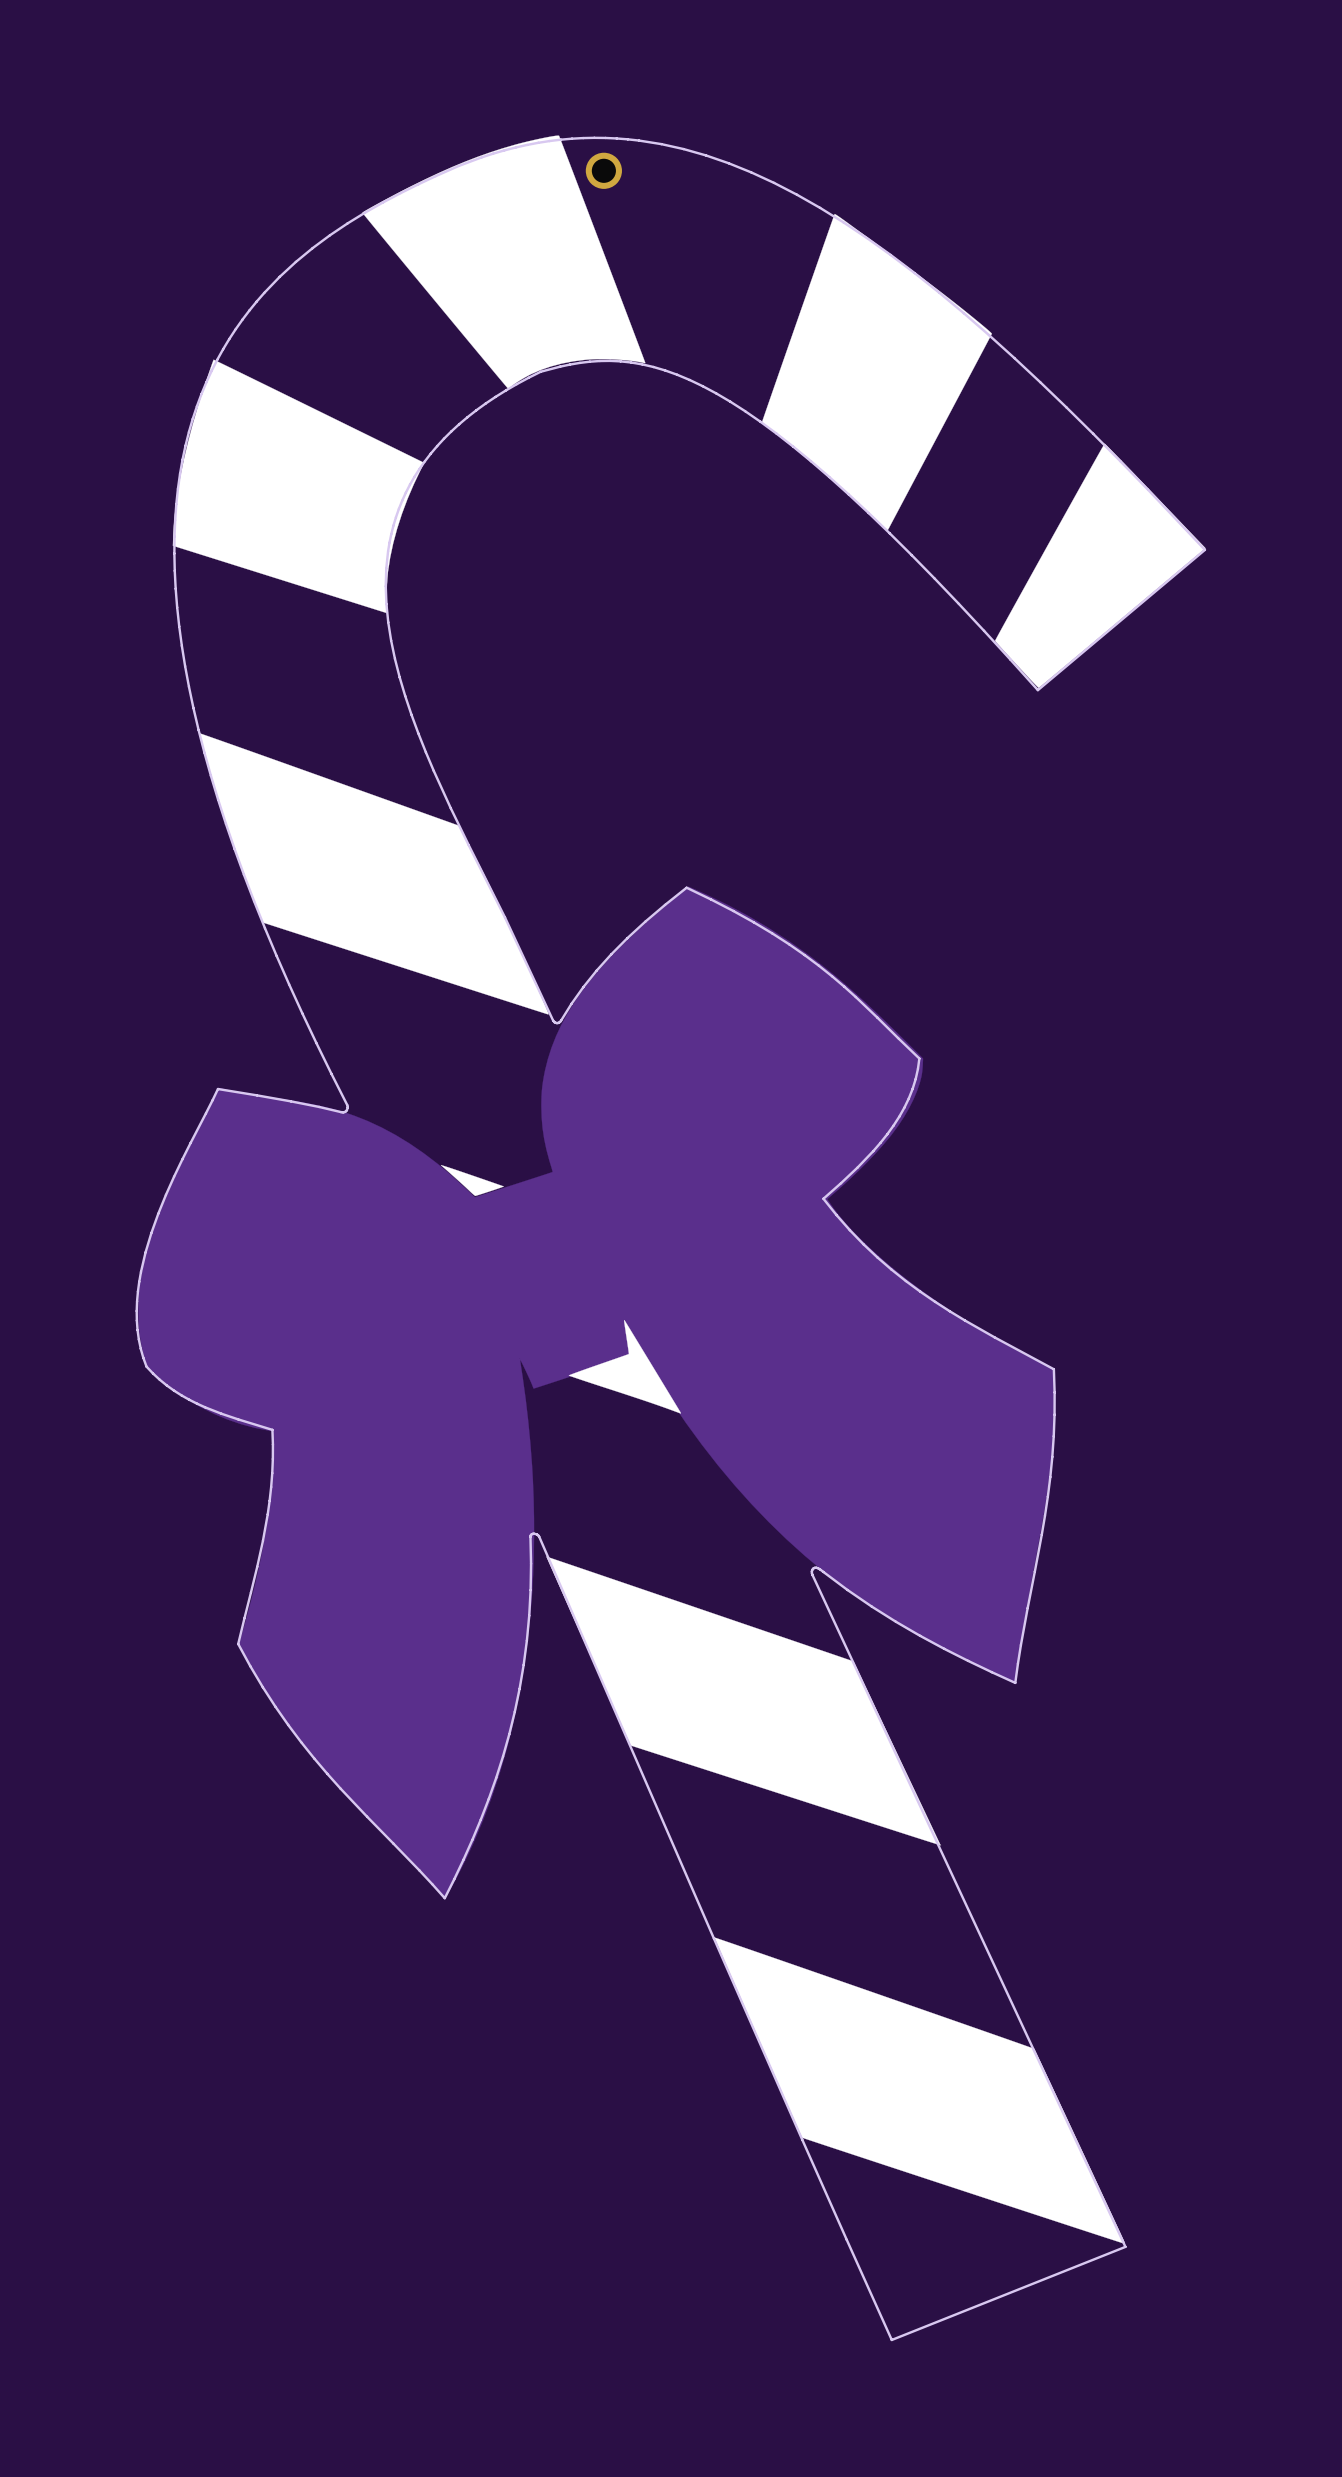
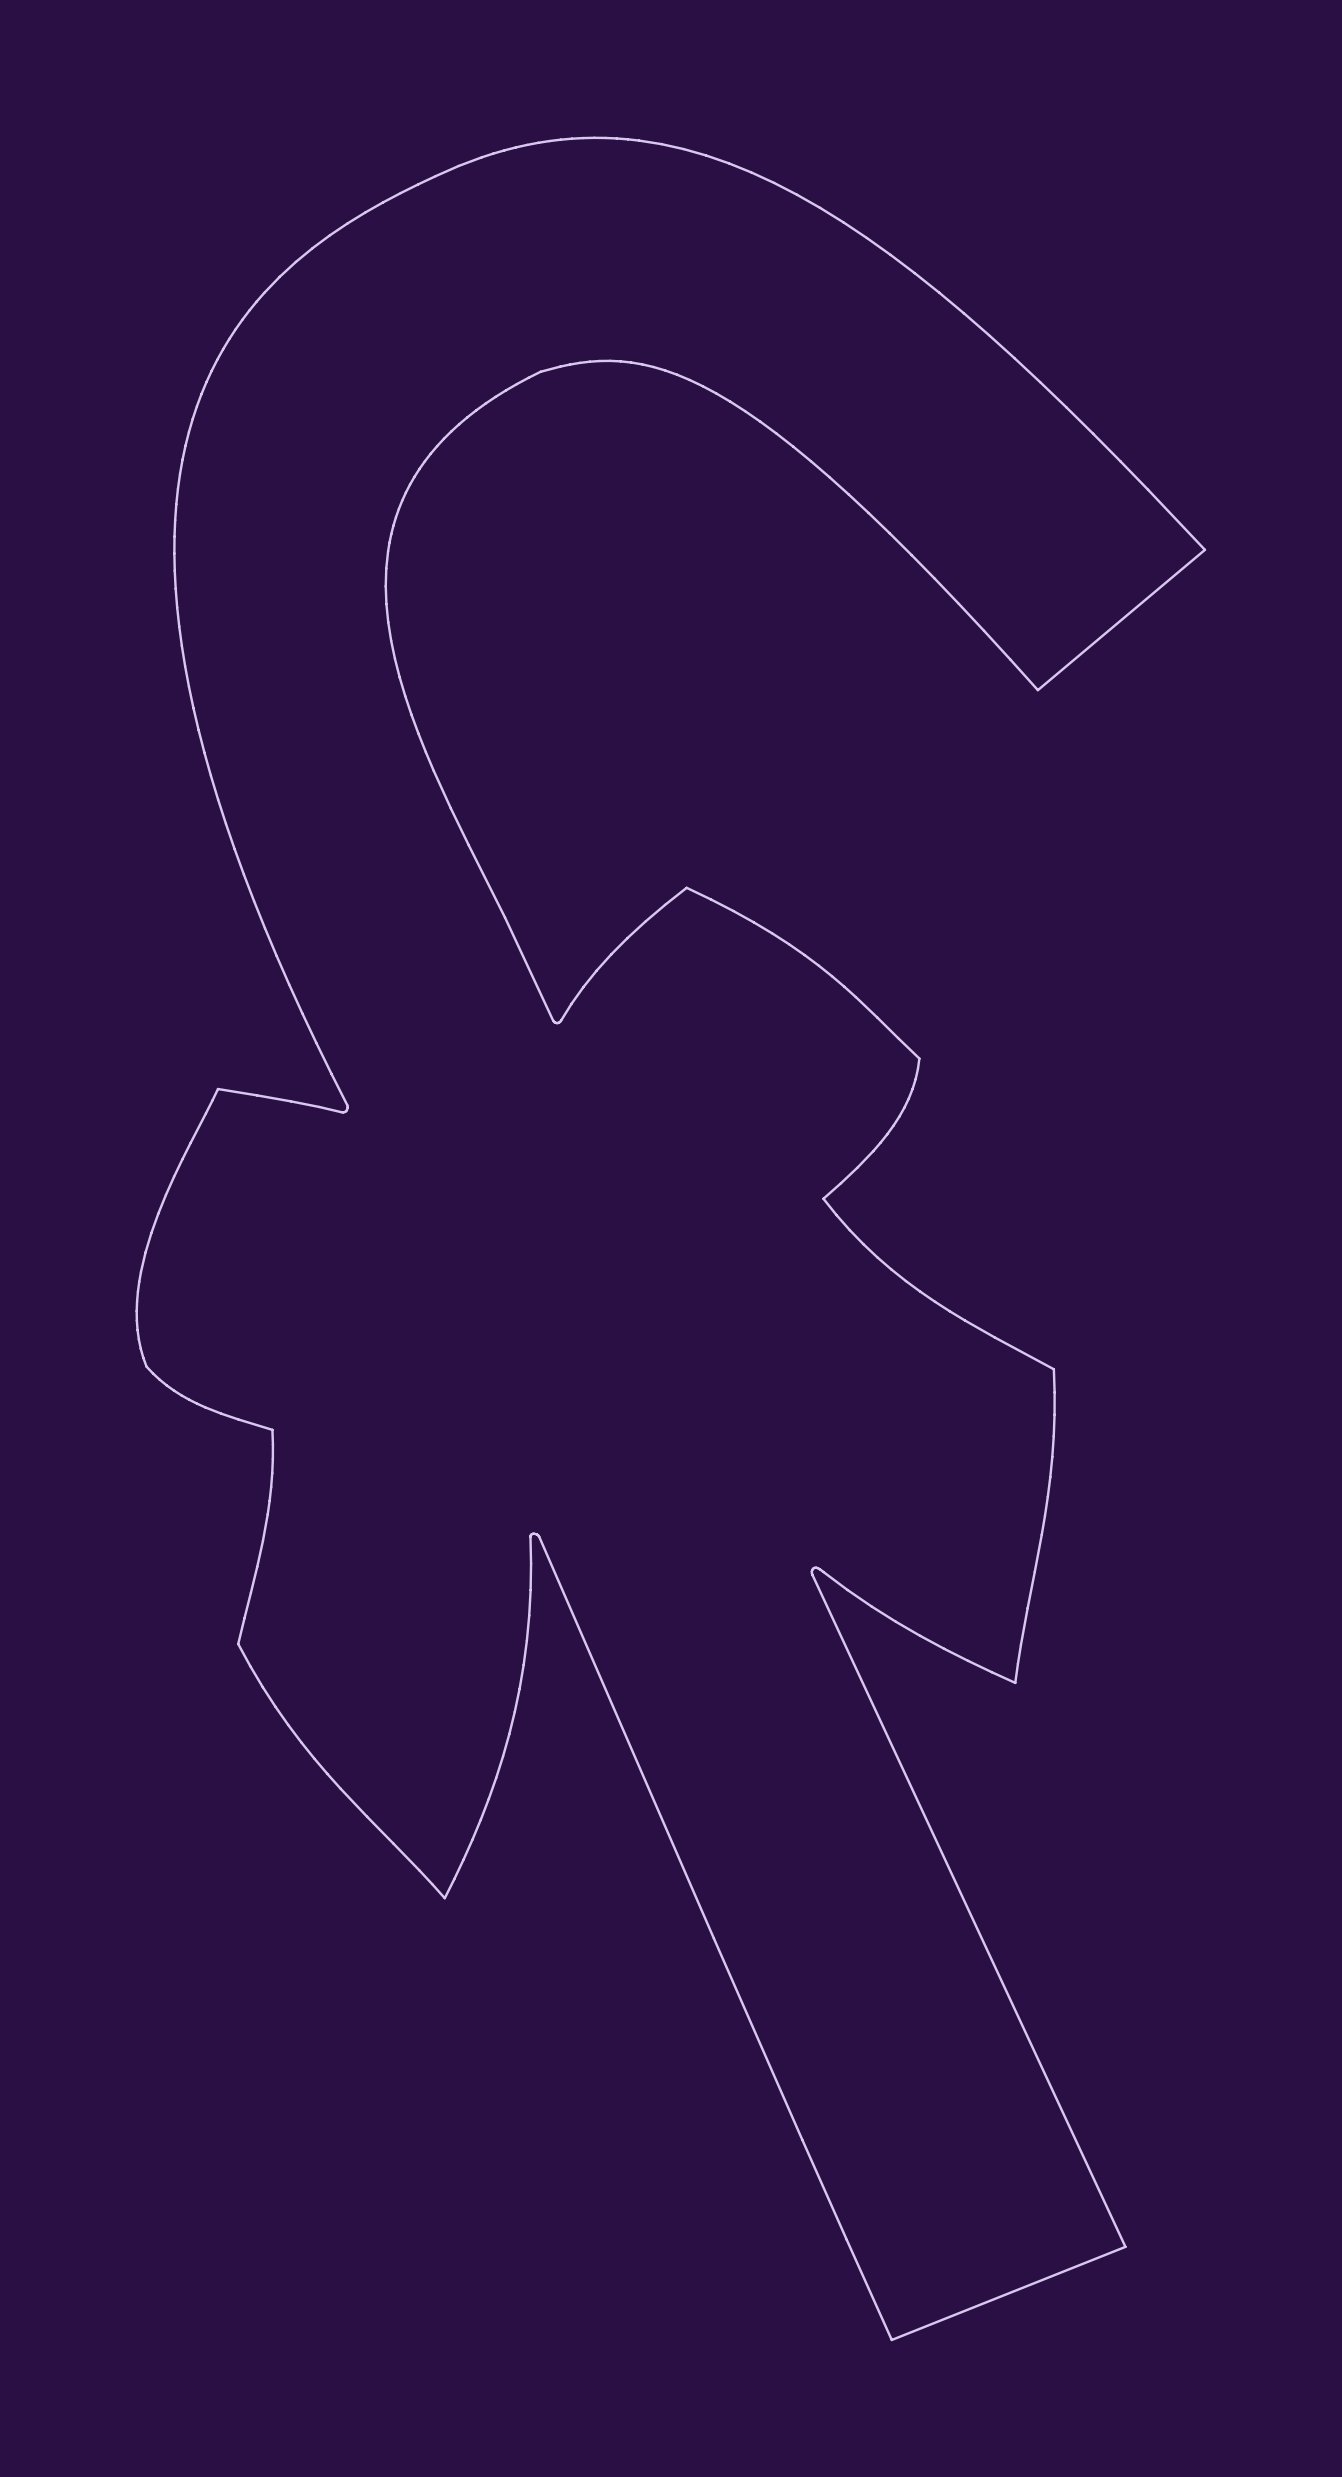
drawing shape: [135, 135, 1207, 2342] -> [135, 136, 1207, 2342]
via: (603, 170) -> none

